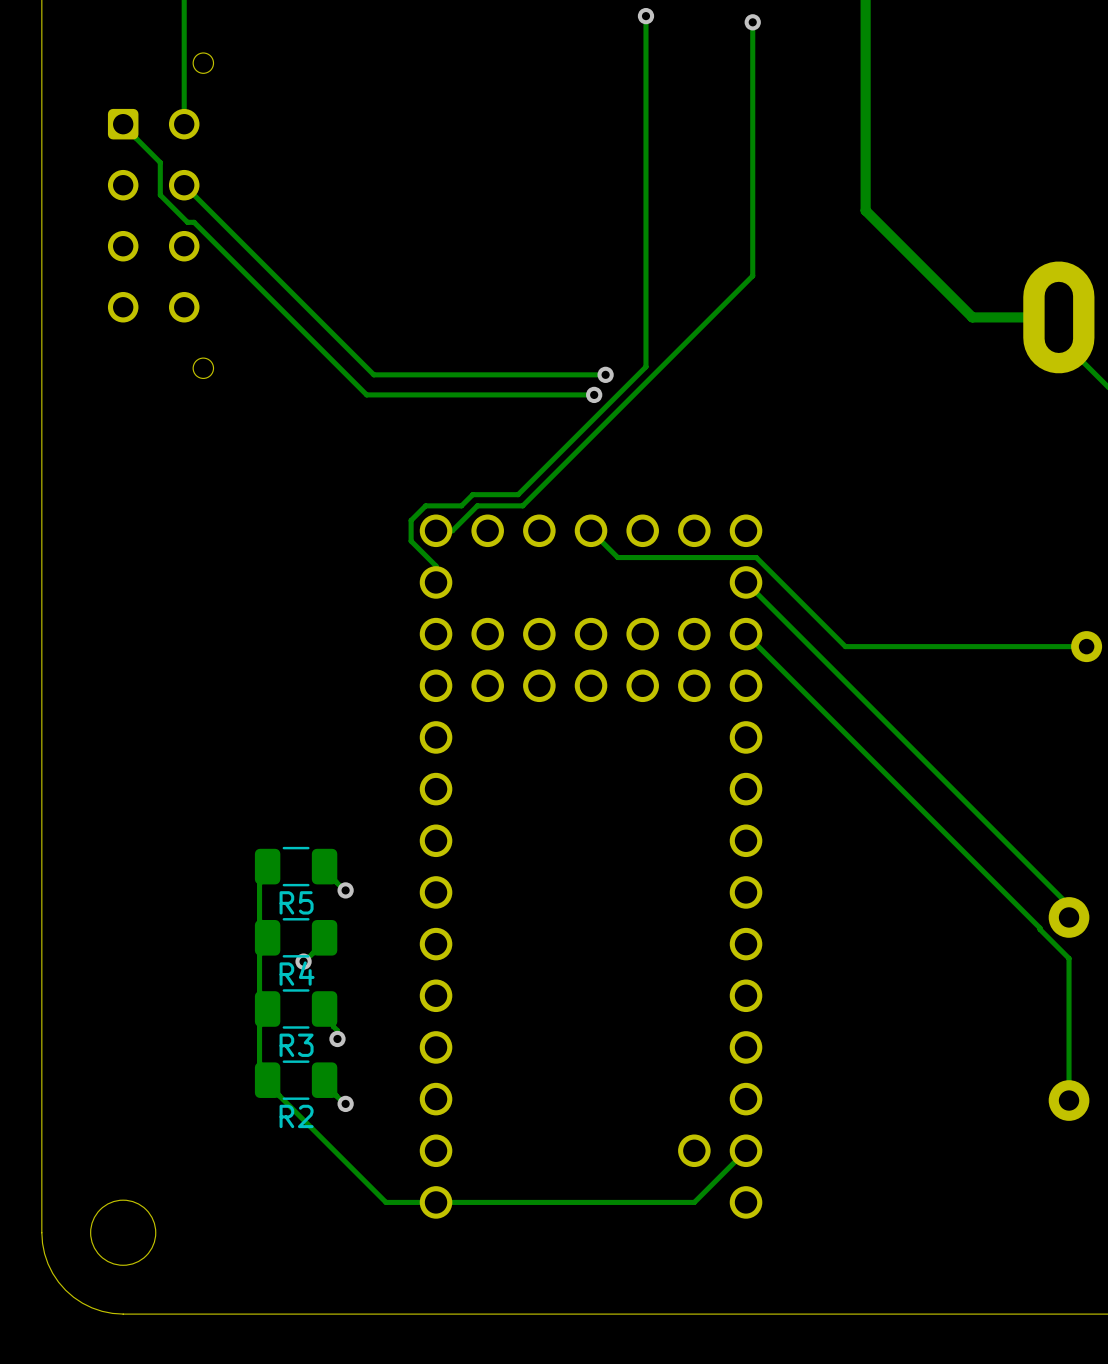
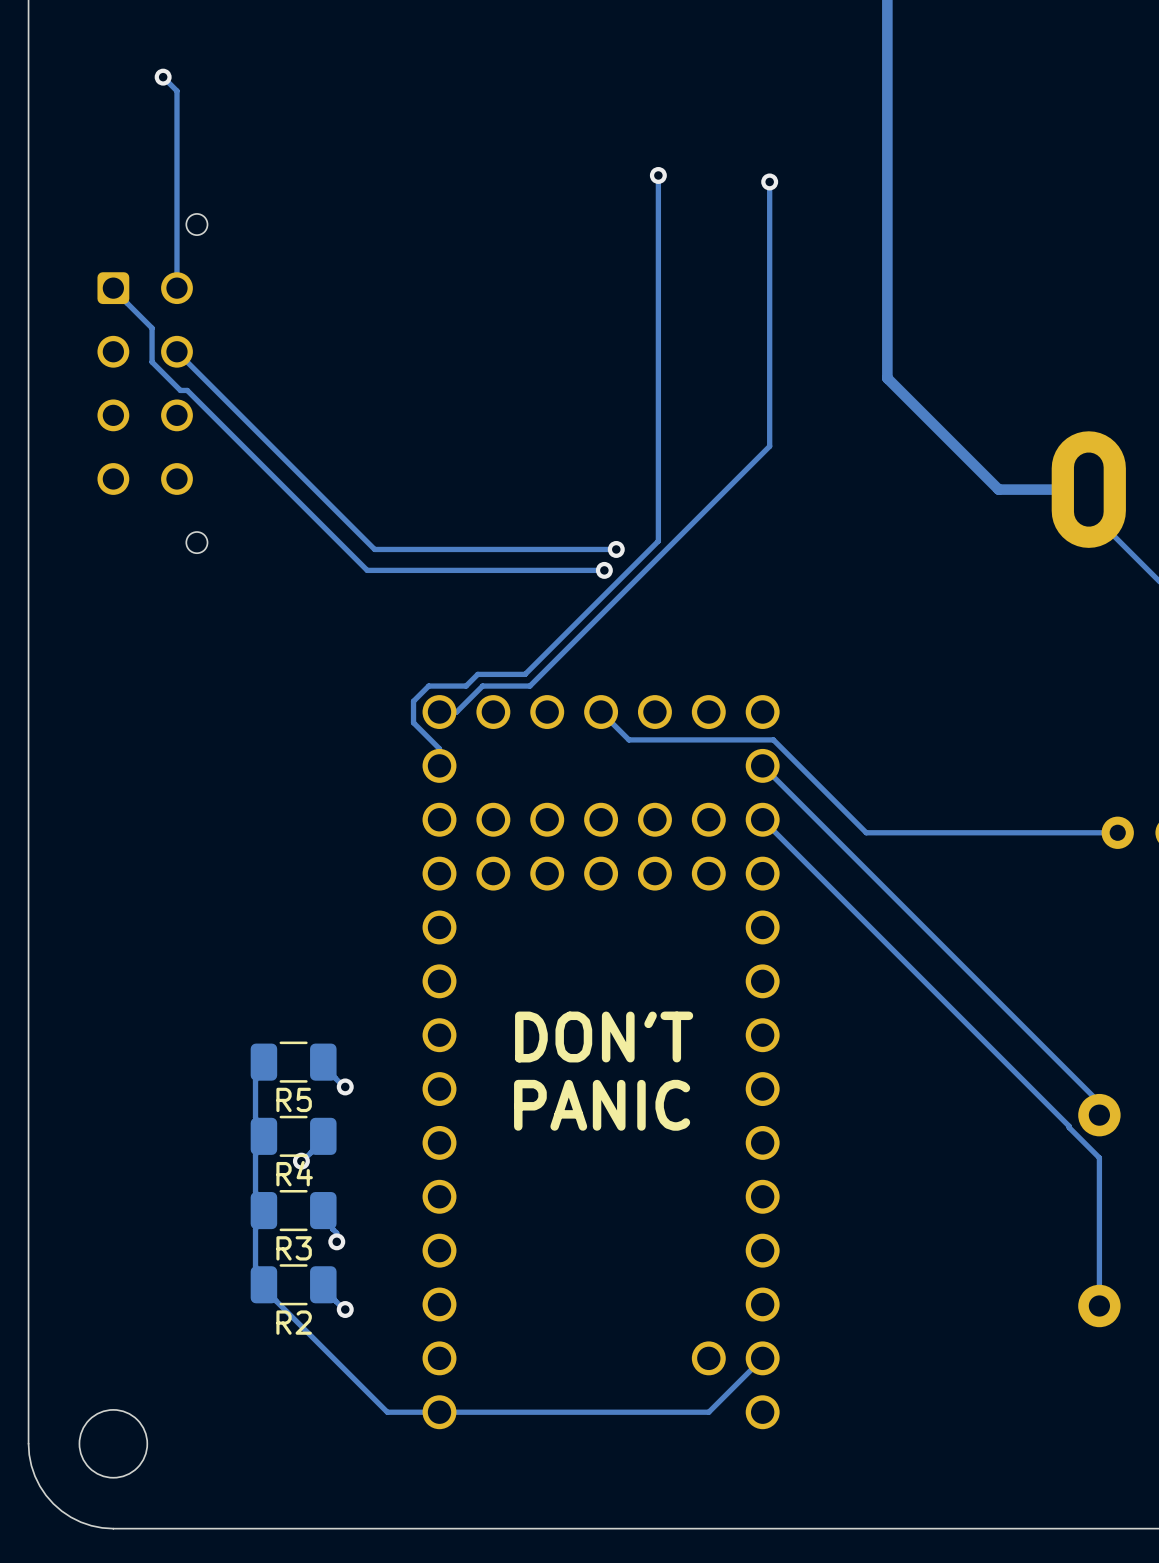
text: none -> DON'T (604, 1037)
text: none -> PANIC (602, 1105)

